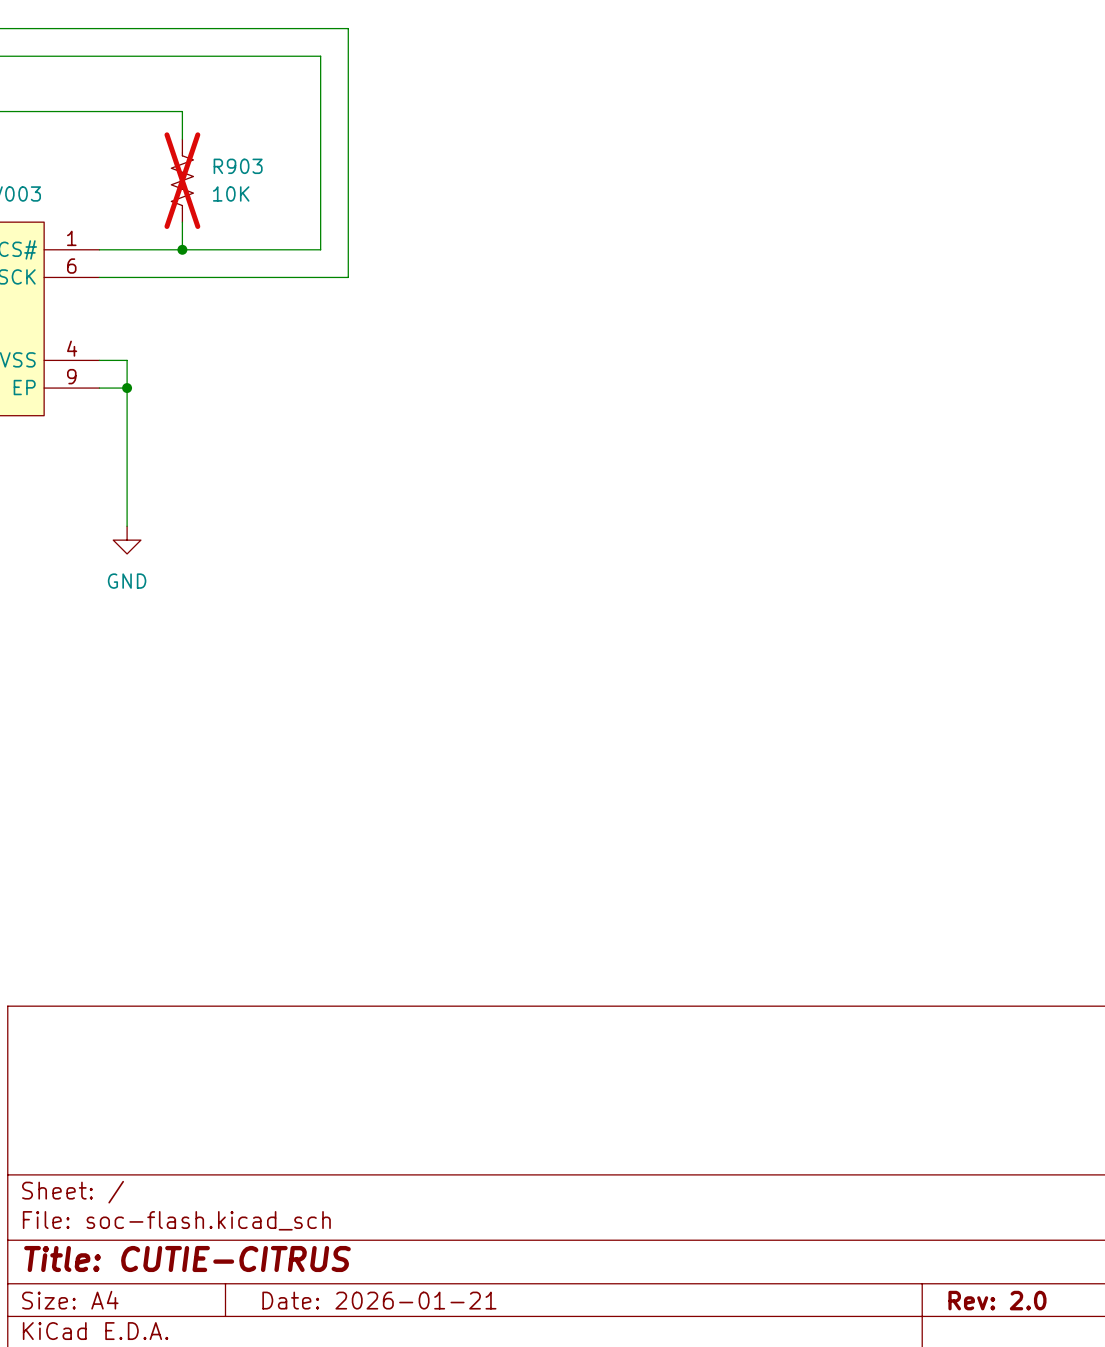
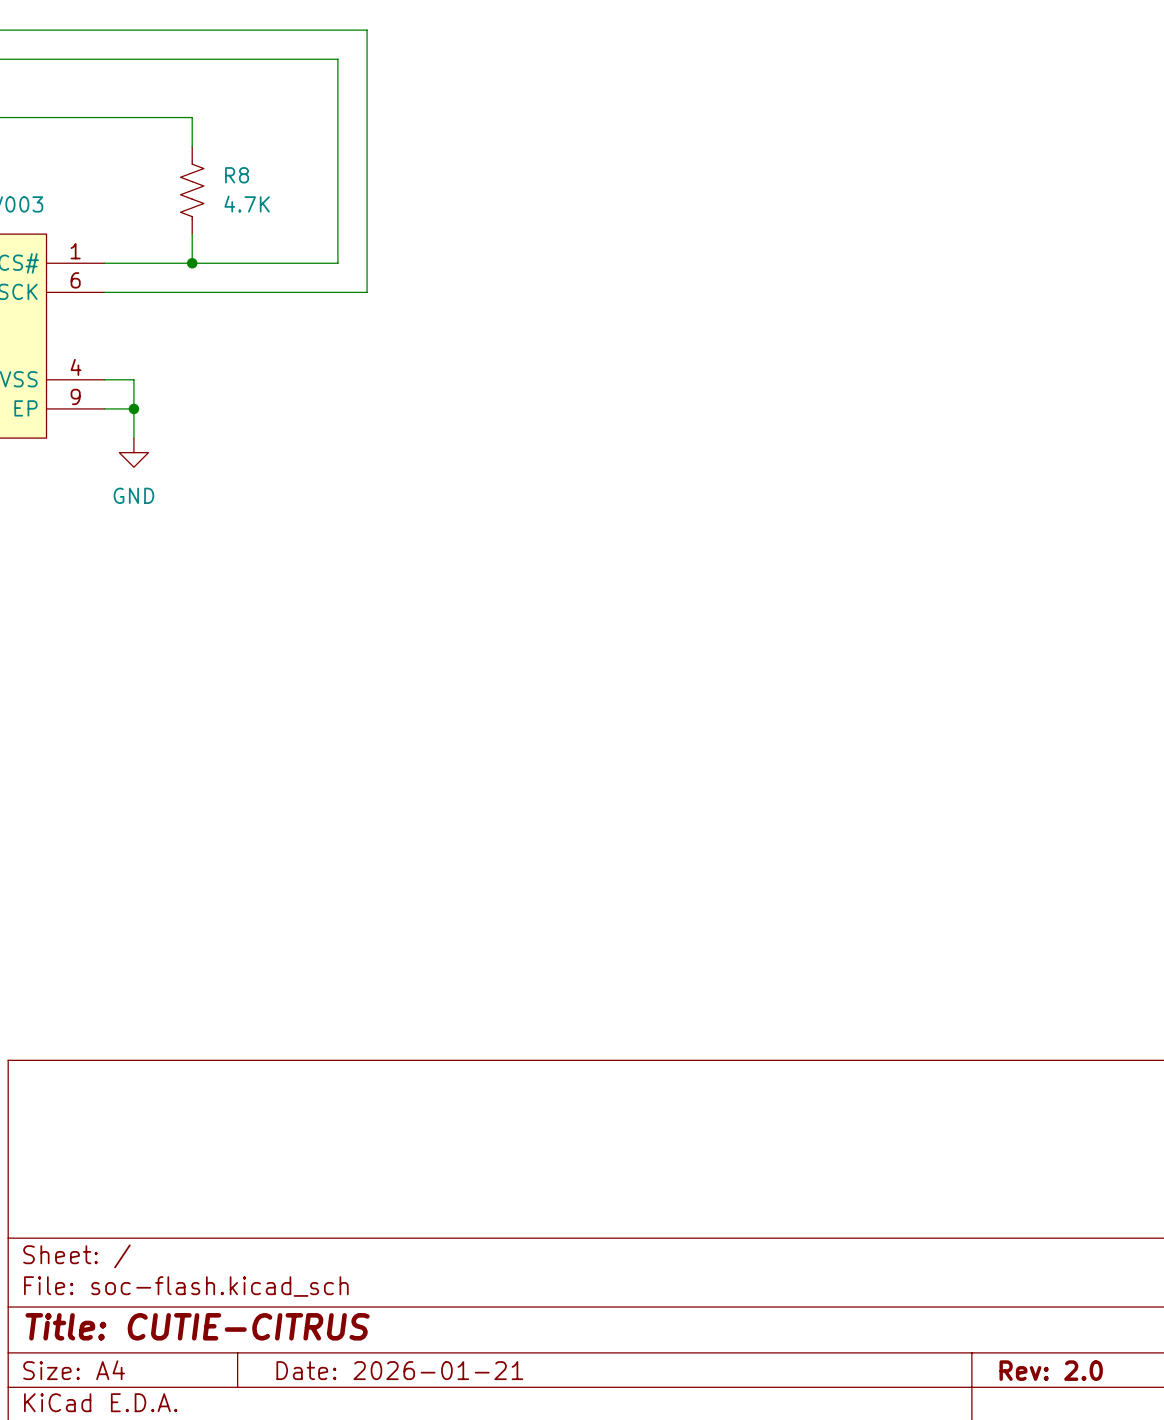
R903 name: R903 (238, 166) -> R8 (237, 175)
R903 do-not-place cross: (182, 180) -> none
R903 value: 10K (231, 193) -> 4.7K (247, 204)
wire: (127, 415) (127, 526) -> none
power symbol position: GND (127, 540) -> GND (133, 452)

